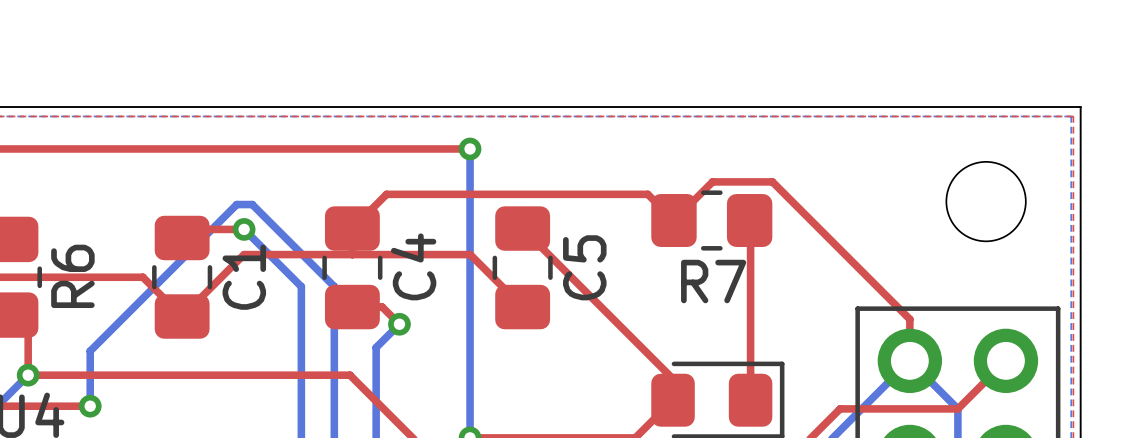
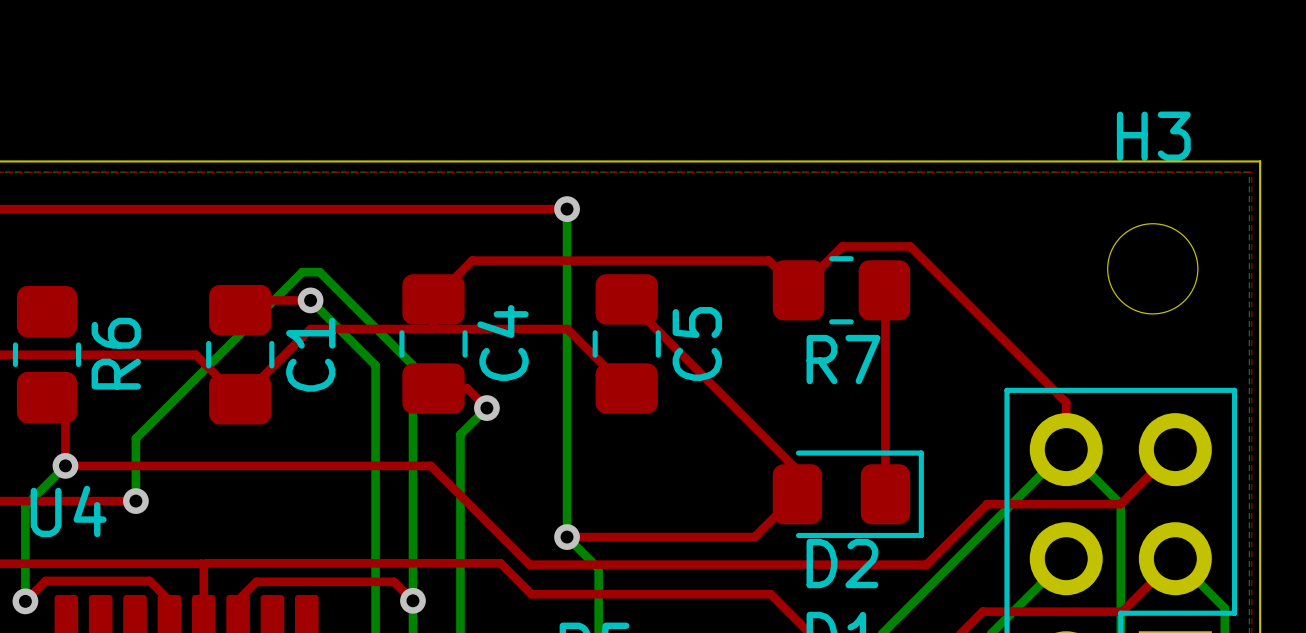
H3 name: none -> H3 (1153, 136)

